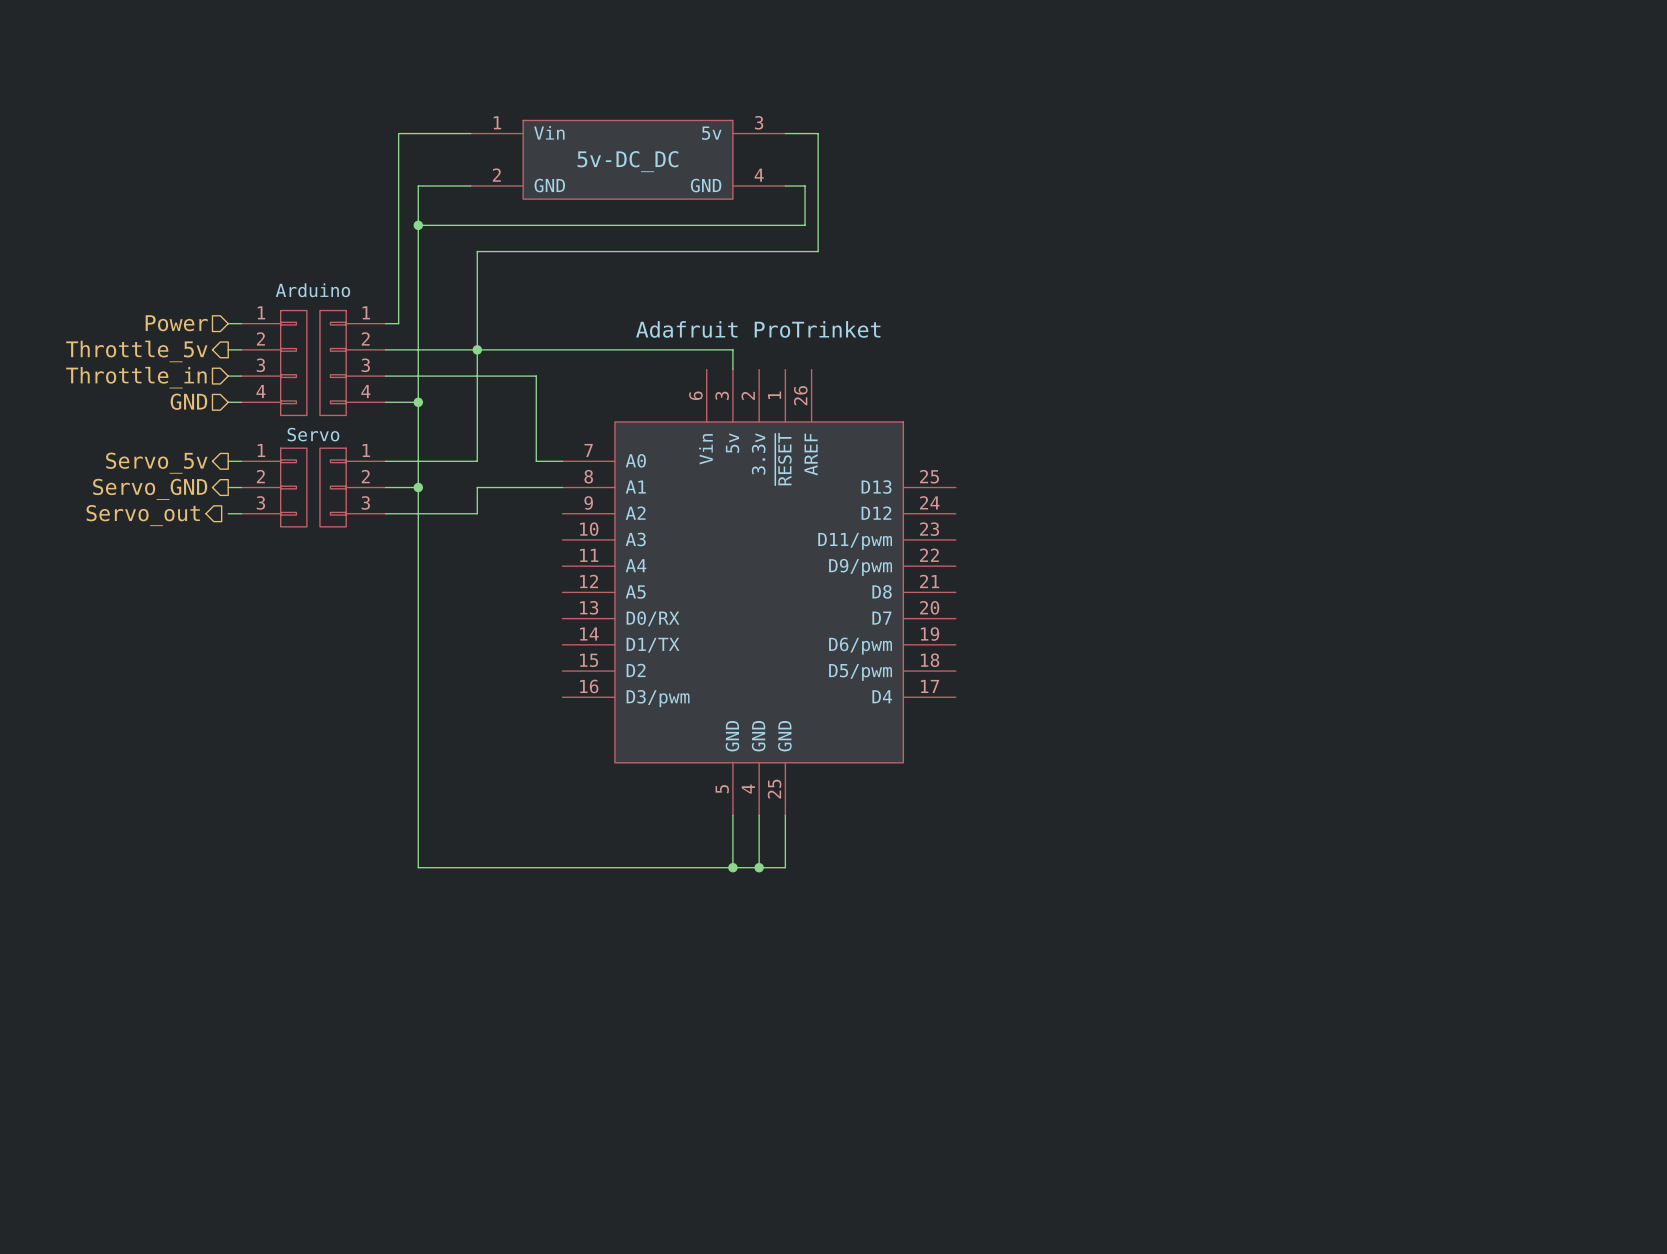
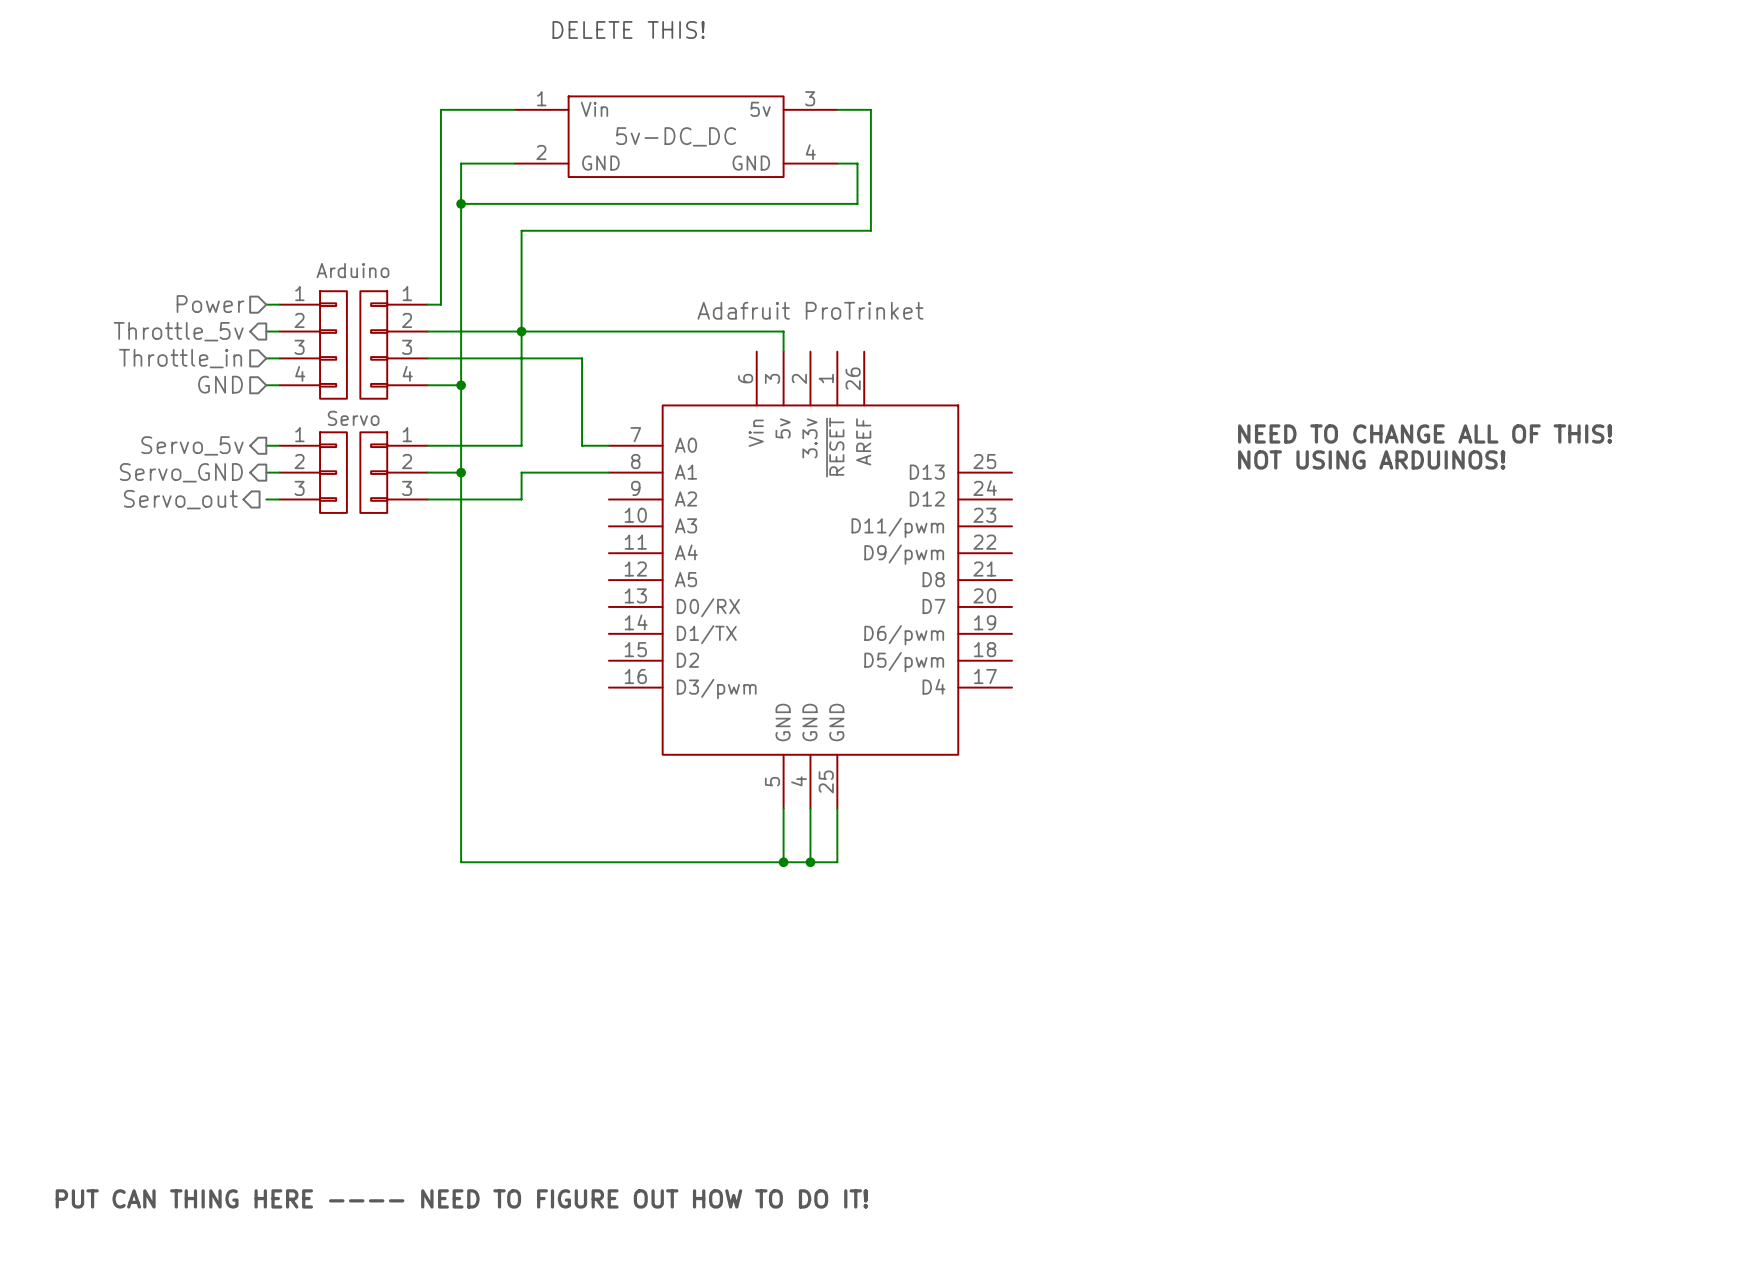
text: none -> DELETE THIS! (628, 29)
text: none -> NEED TO CHANGE ALL OF THIS! (1425, 433)
text: none -> NOT USING ARDUINOS! (1371, 459)
text: none -> PUT CAN THING HERE ---- NEED TO FIGURE OUT HOW TO DO IT! (461, 1198)

